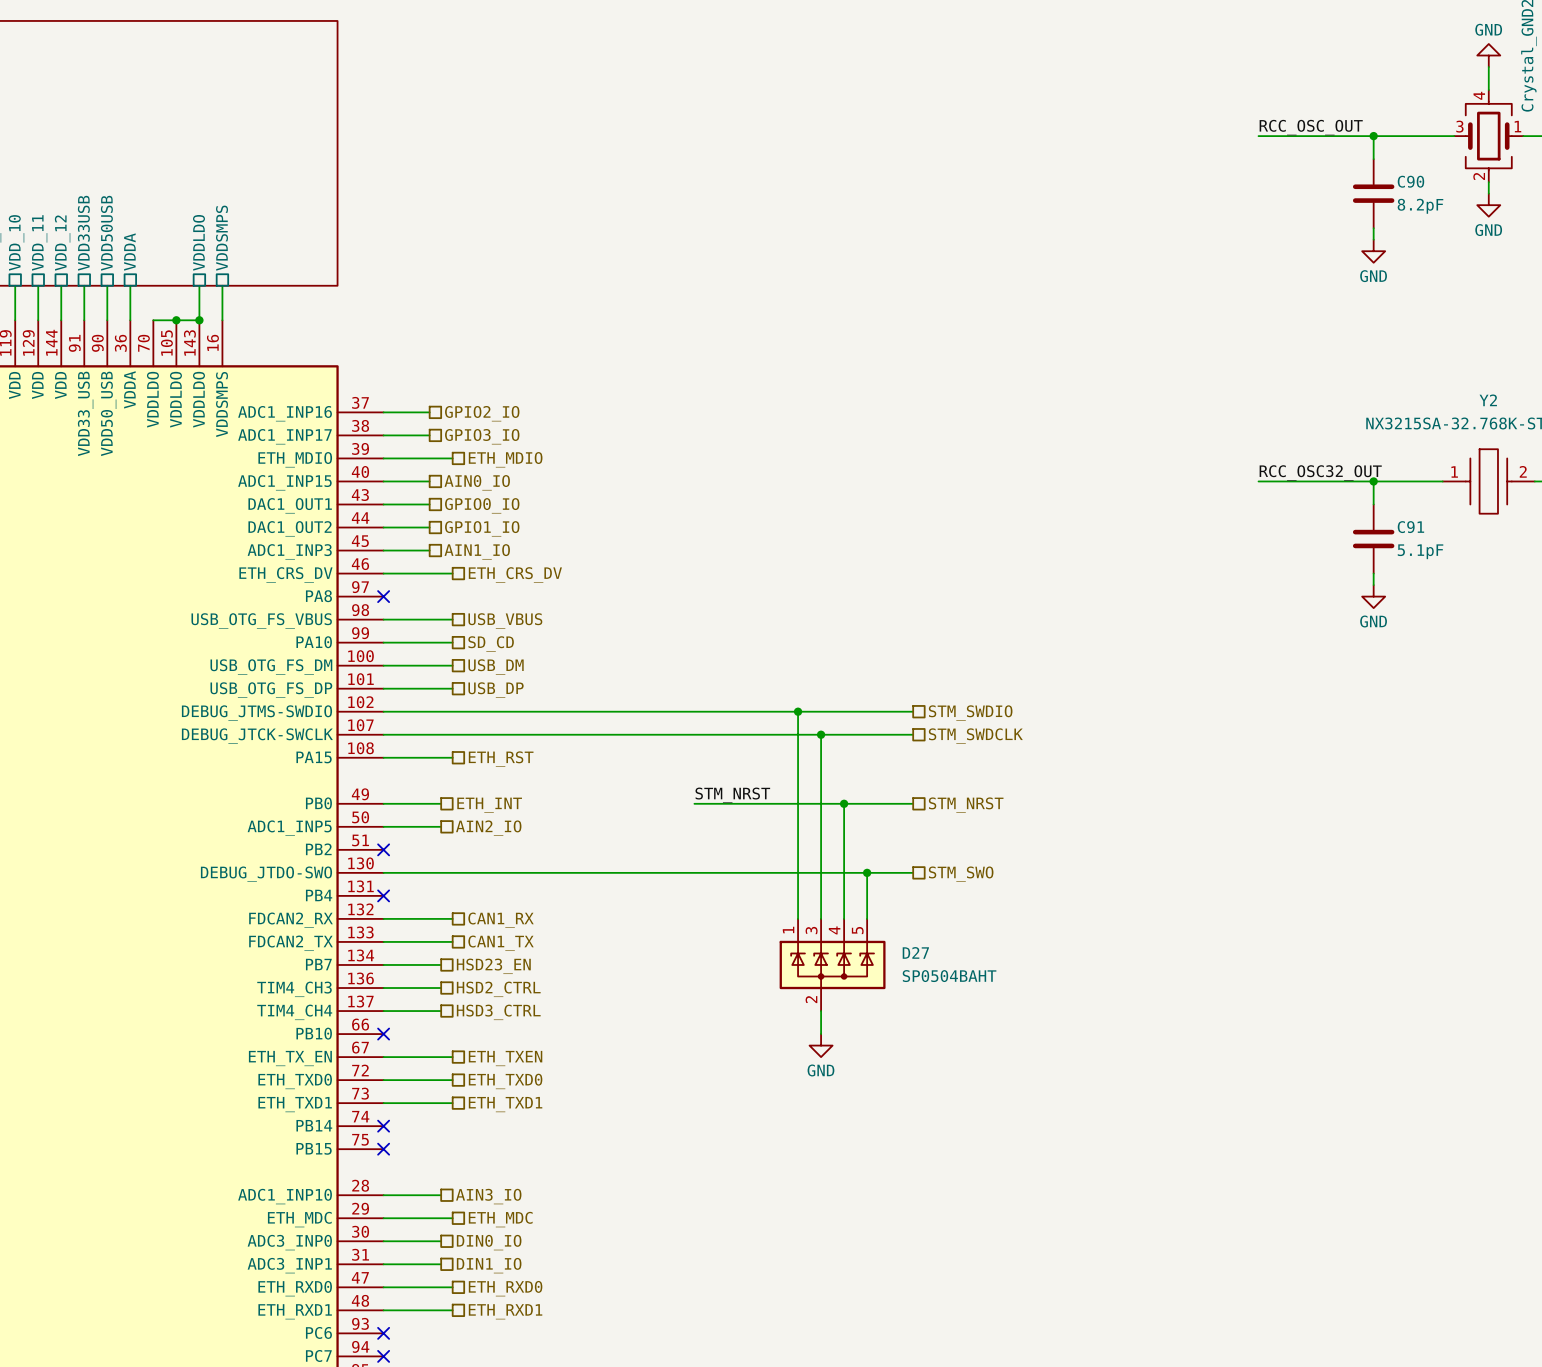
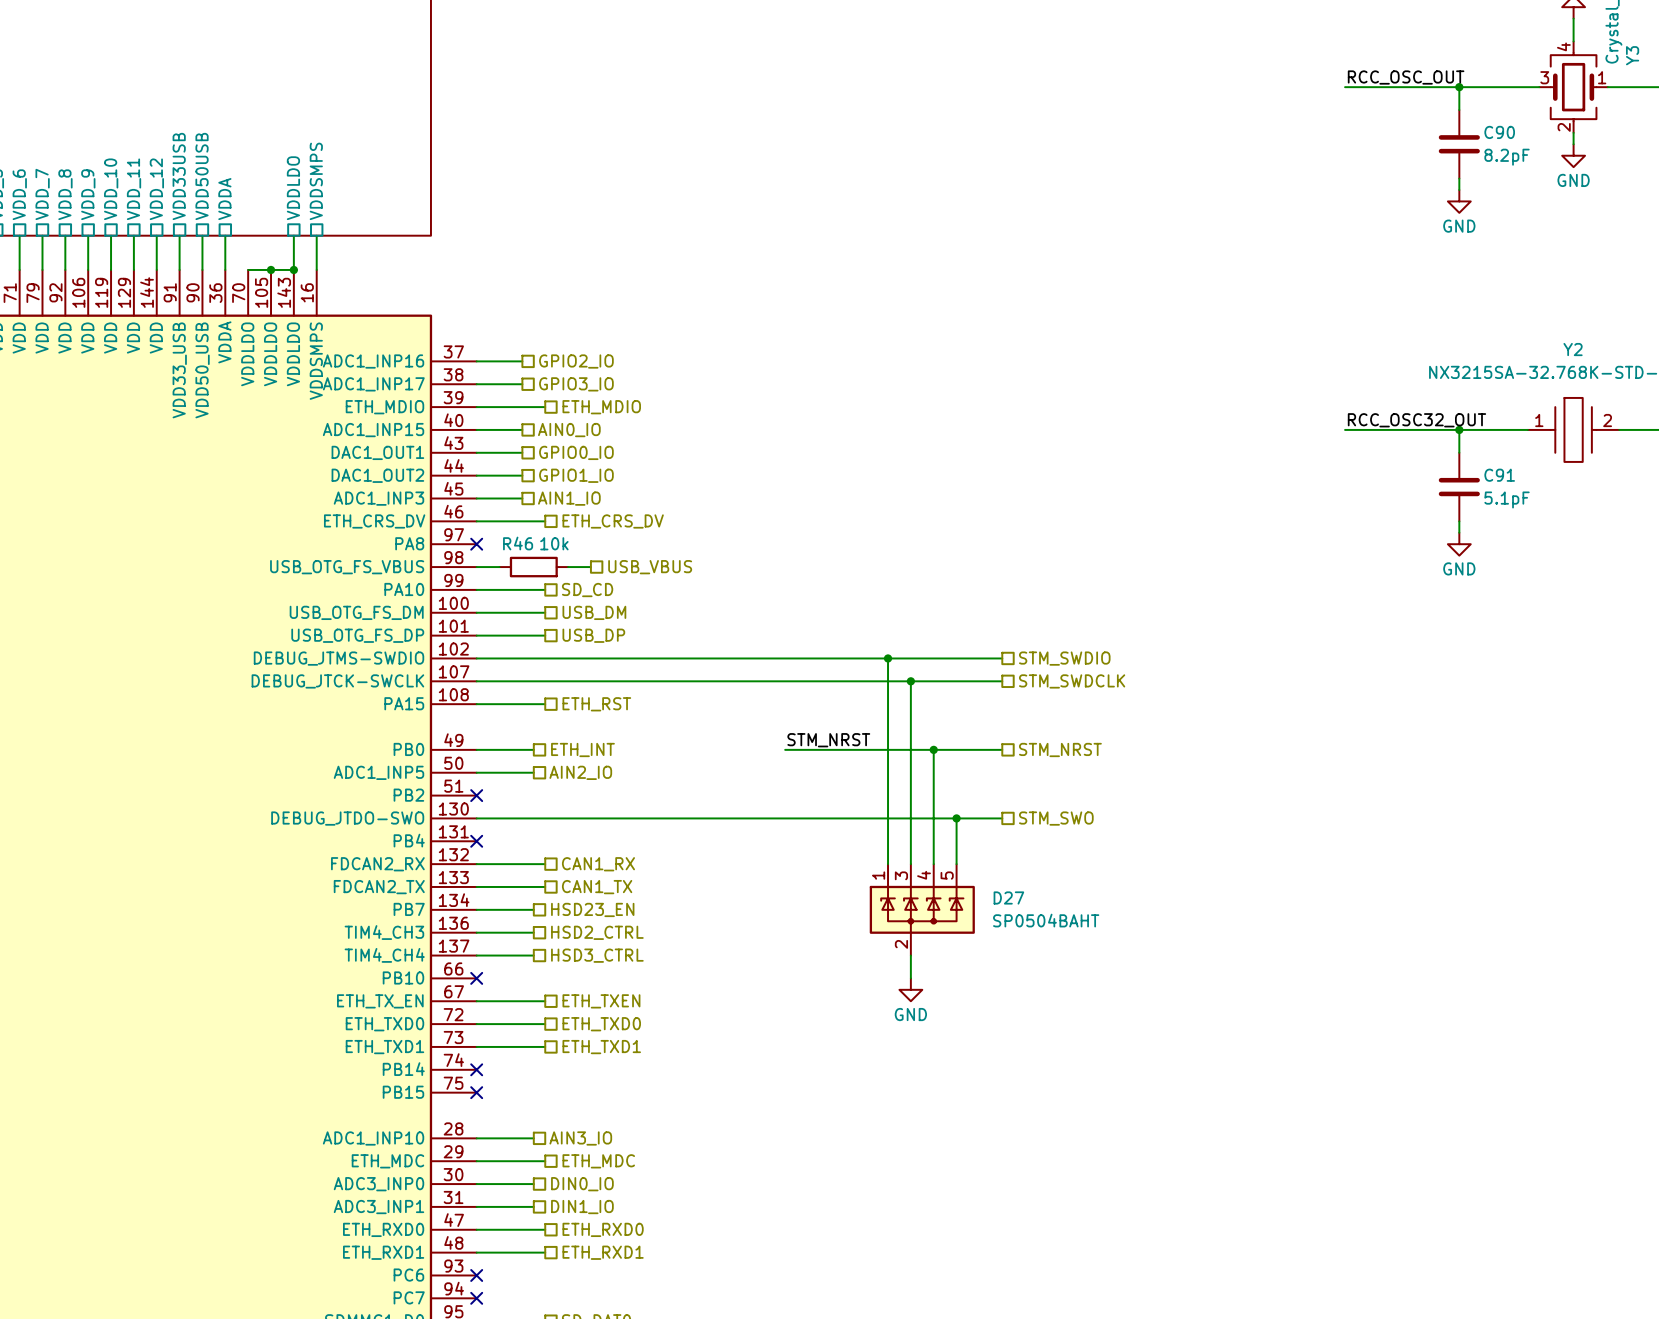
wire: (406, 619) (452, 619) -> none
R46: none -> 10k (533, 567)
wire: none -> (568, 567) (590, 567)
hierarchical label position: USB_VBUS (505, 620) -> USB_VBUS (650, 567)

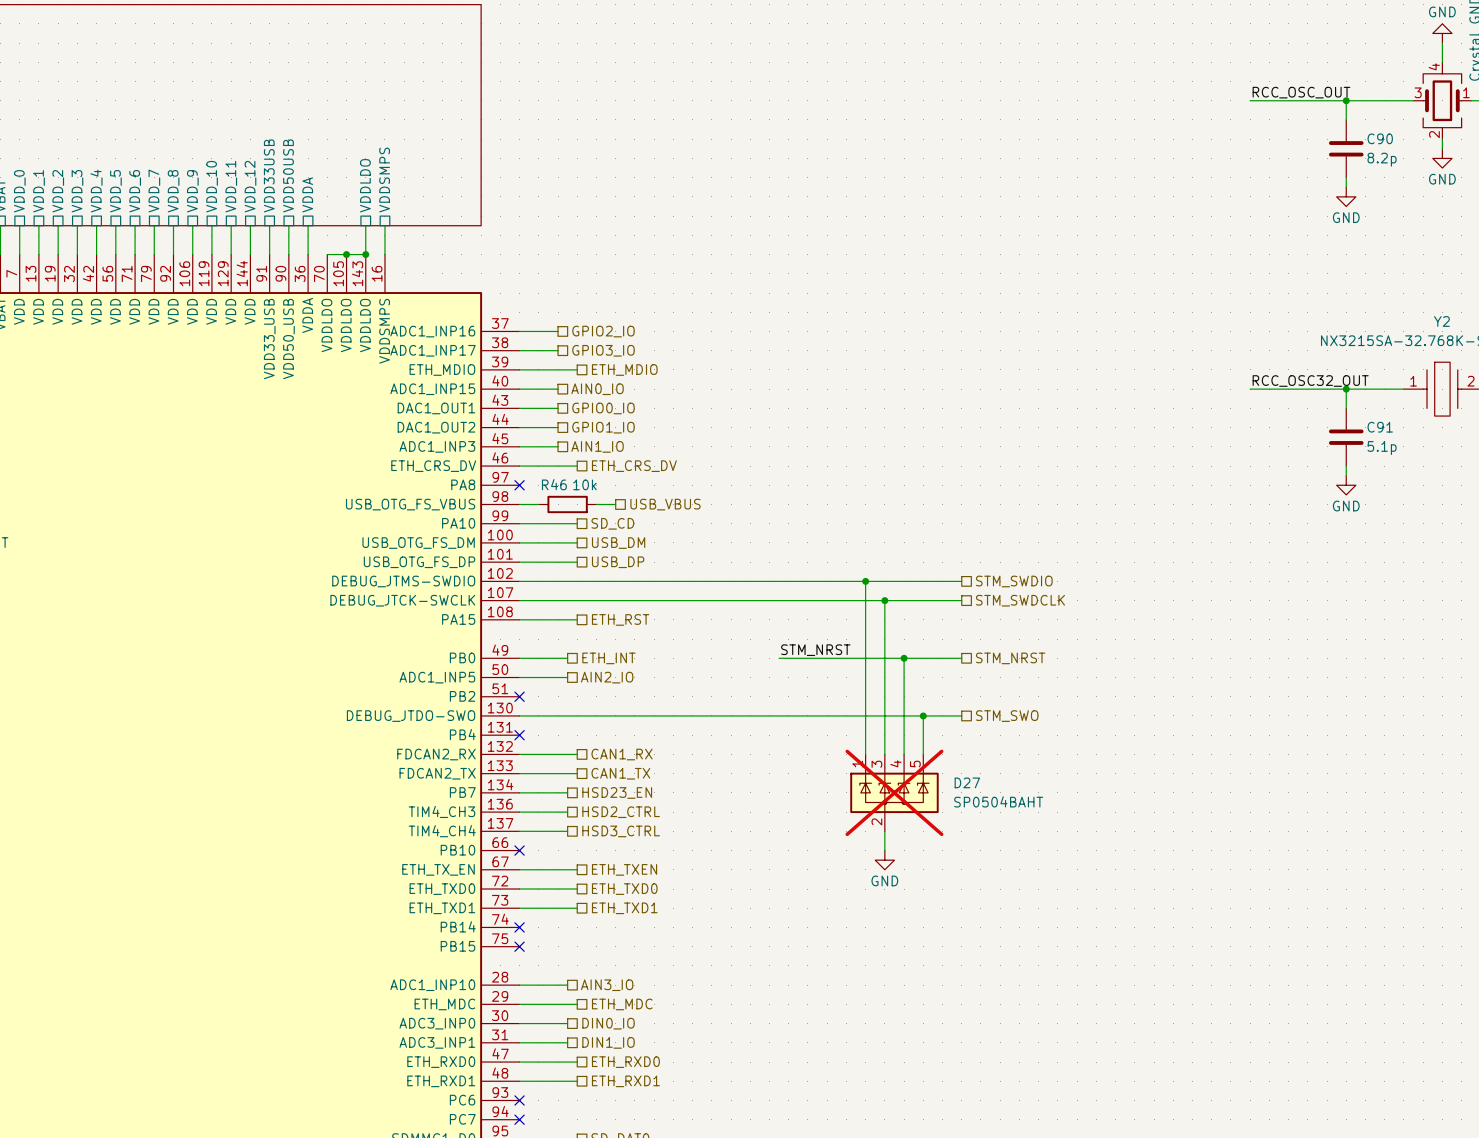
C90 value: 8.2pF (1507, 157) -> 8.2p (1382, 159)
C91 value: 5.1pF (1507, 499) -> 5.1p (1382, 448)
D27 do-not-place cross: none -> (894, 792)

